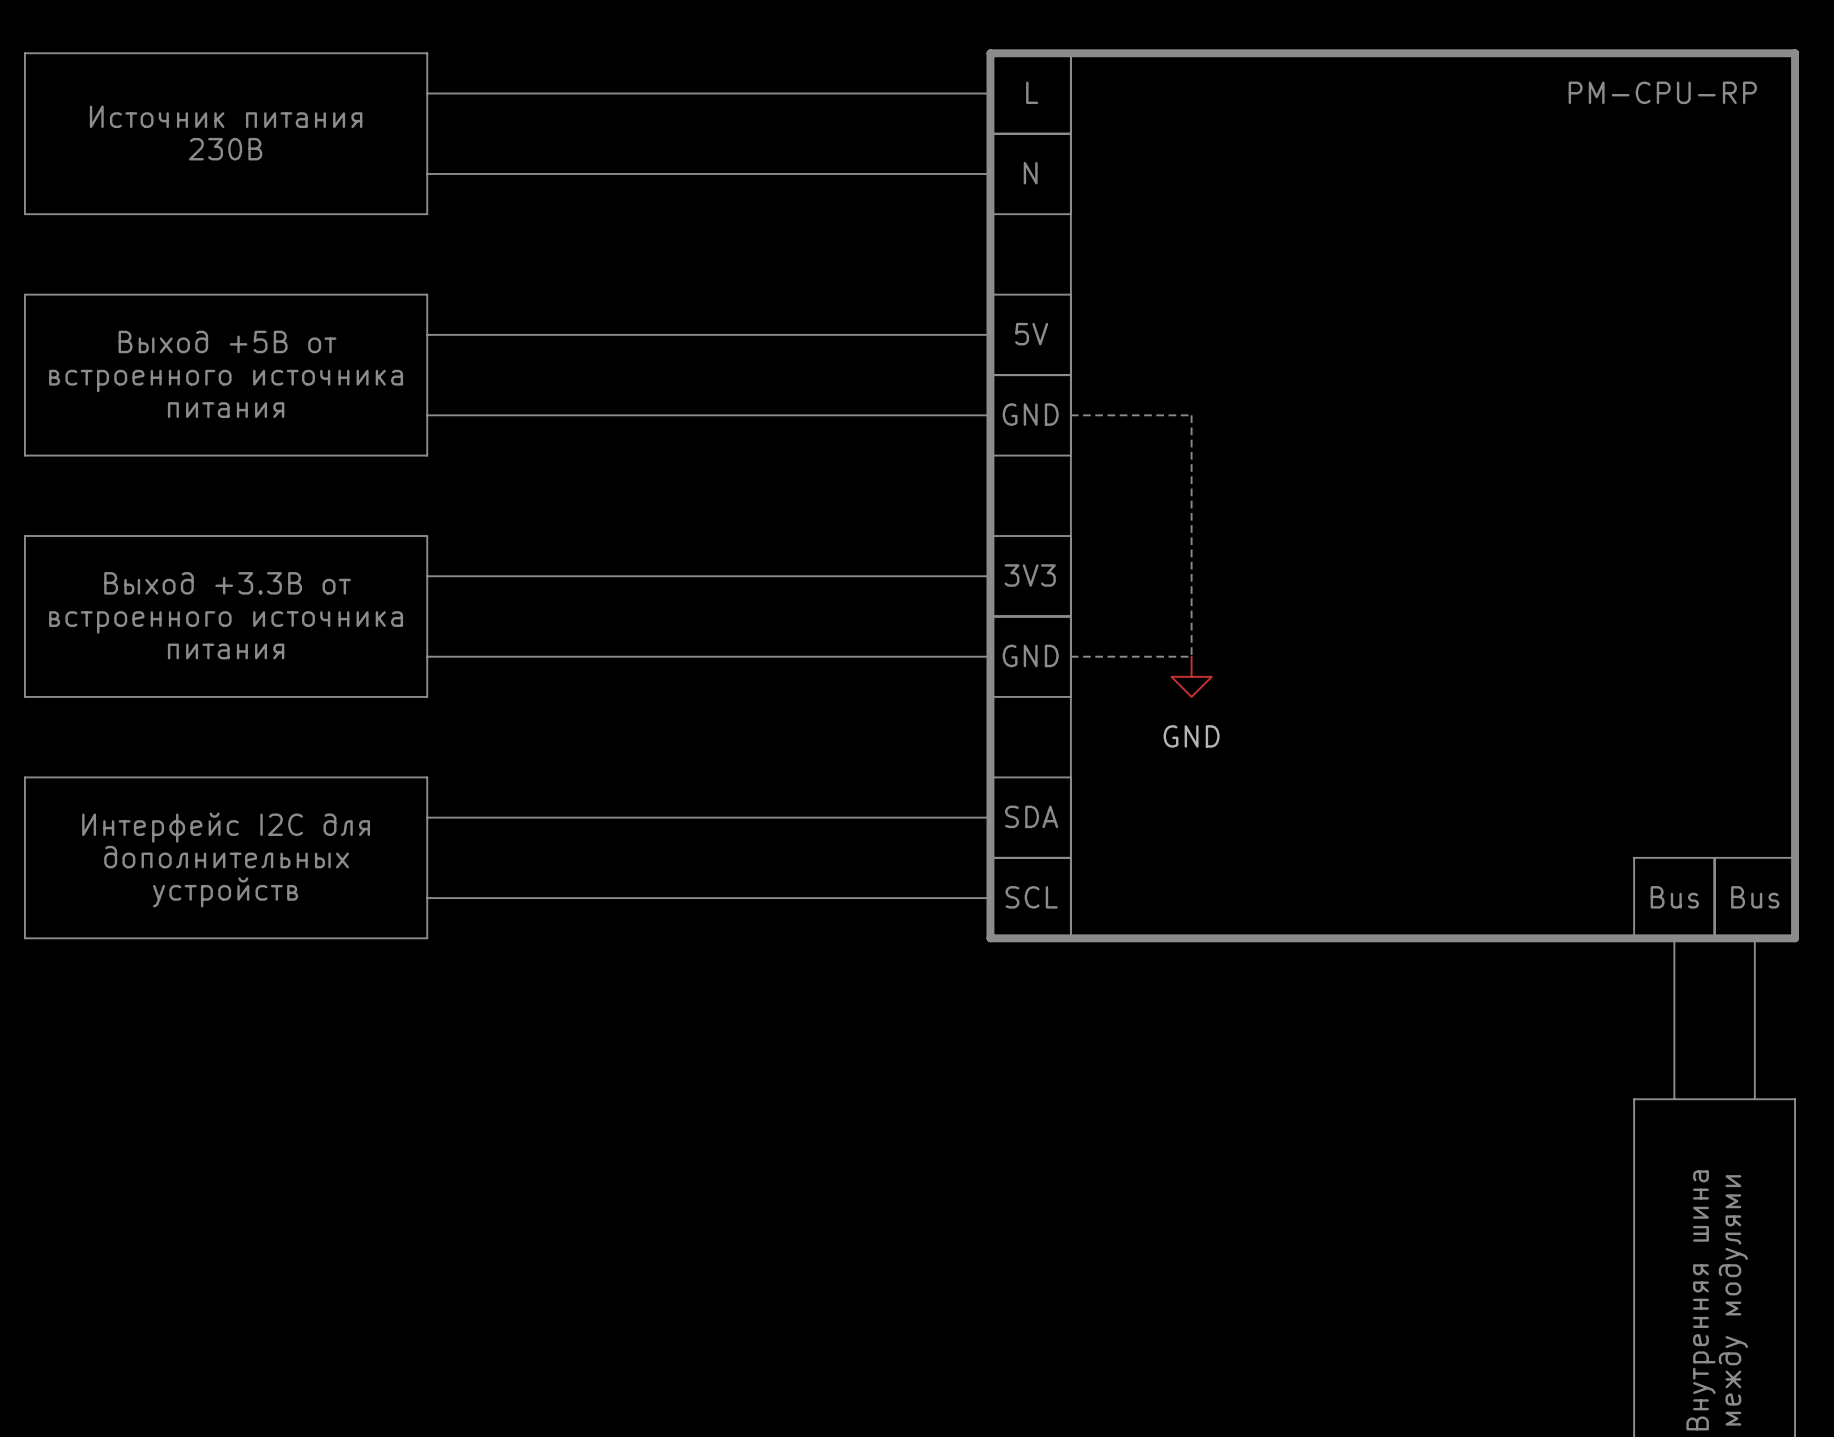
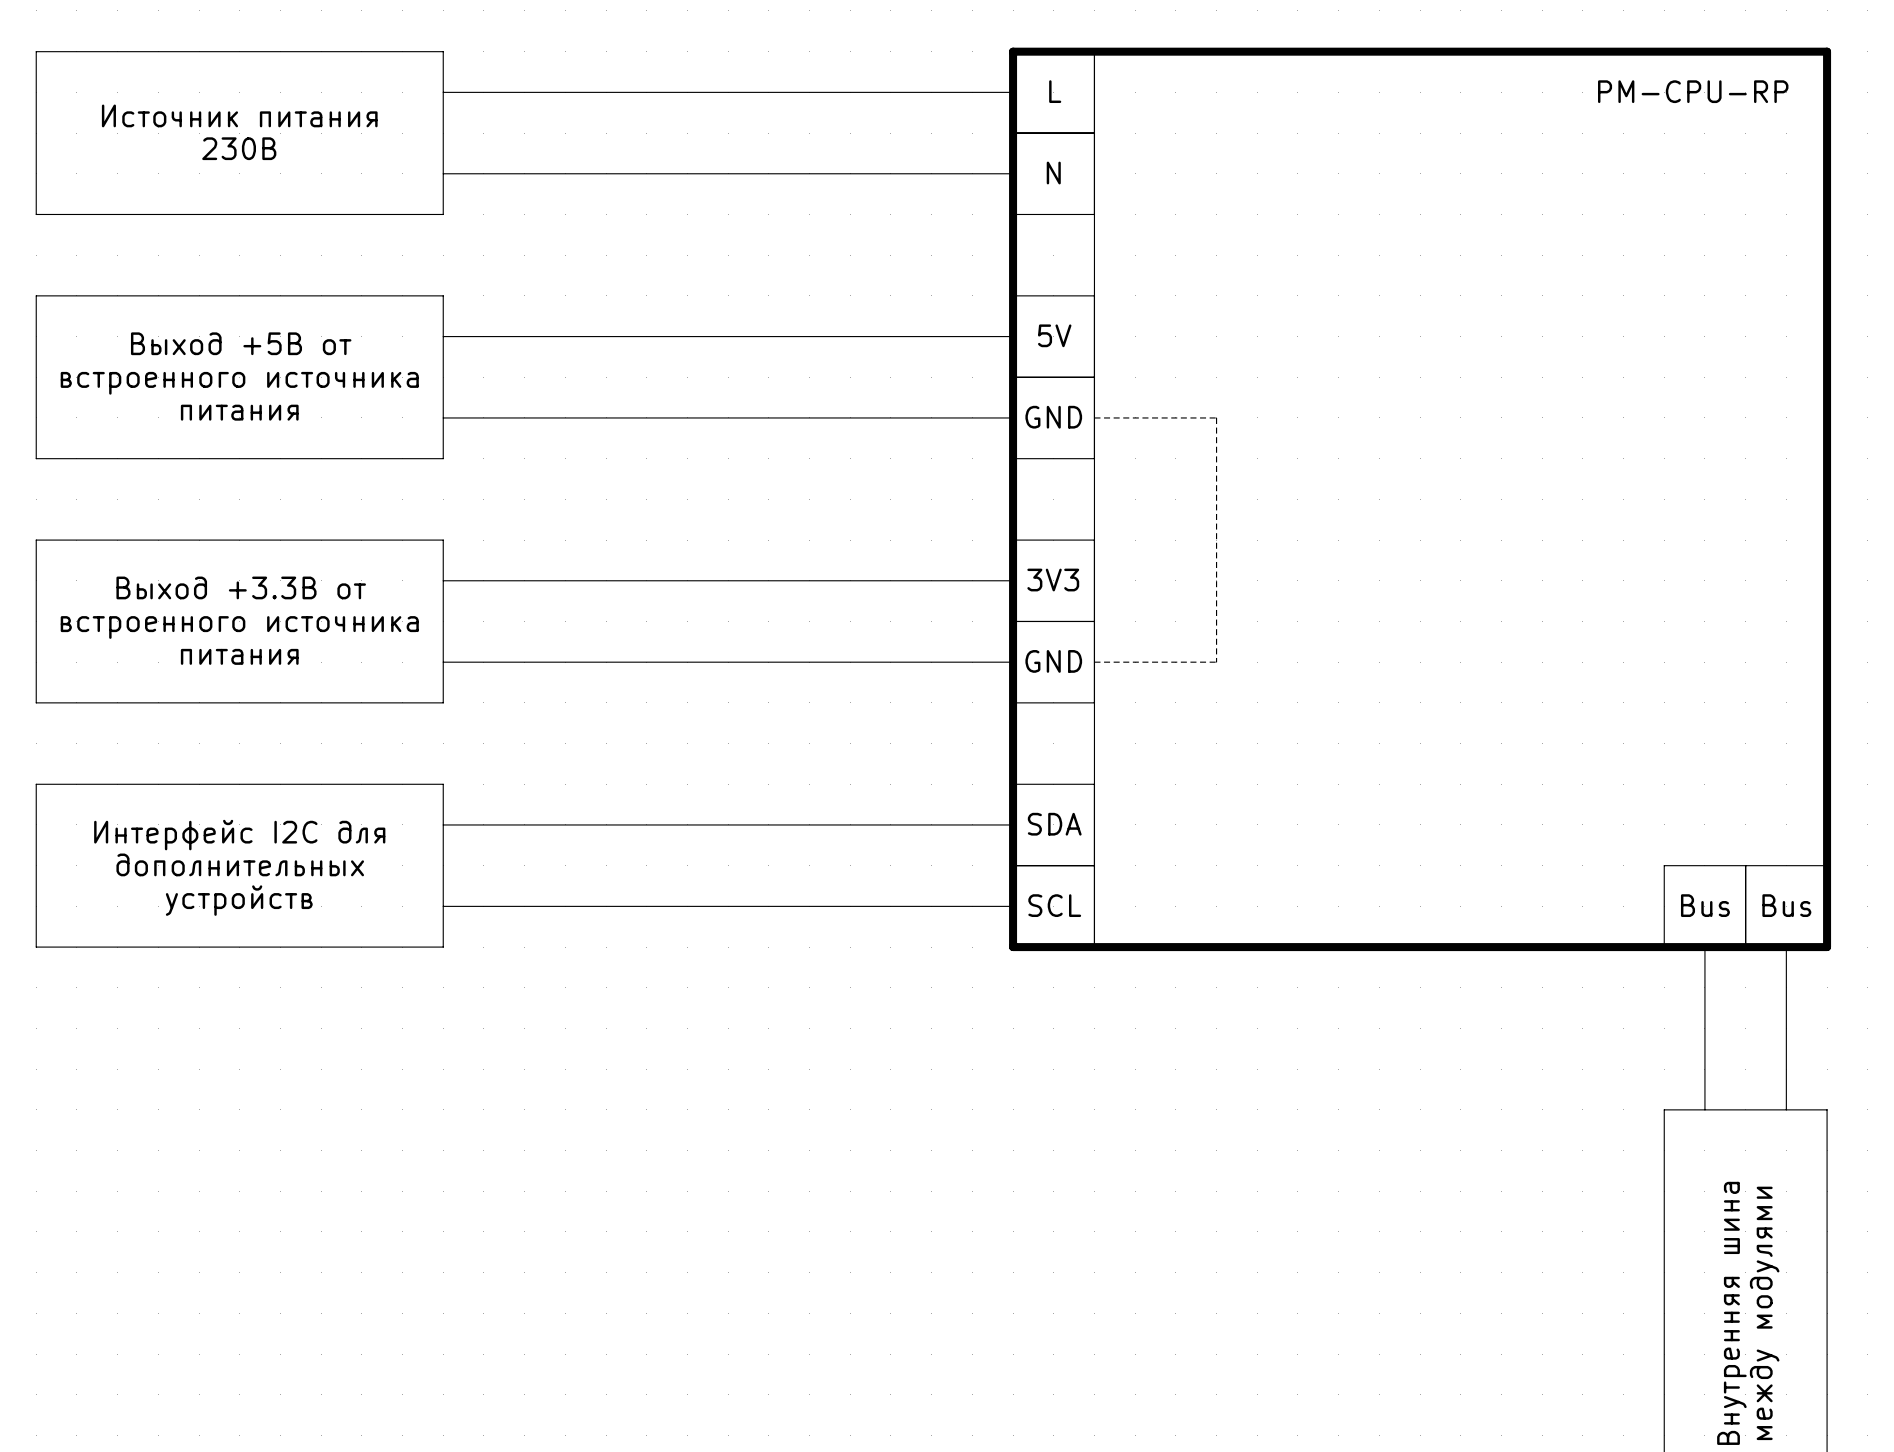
power symbol: GND (1191, 676) -> none

